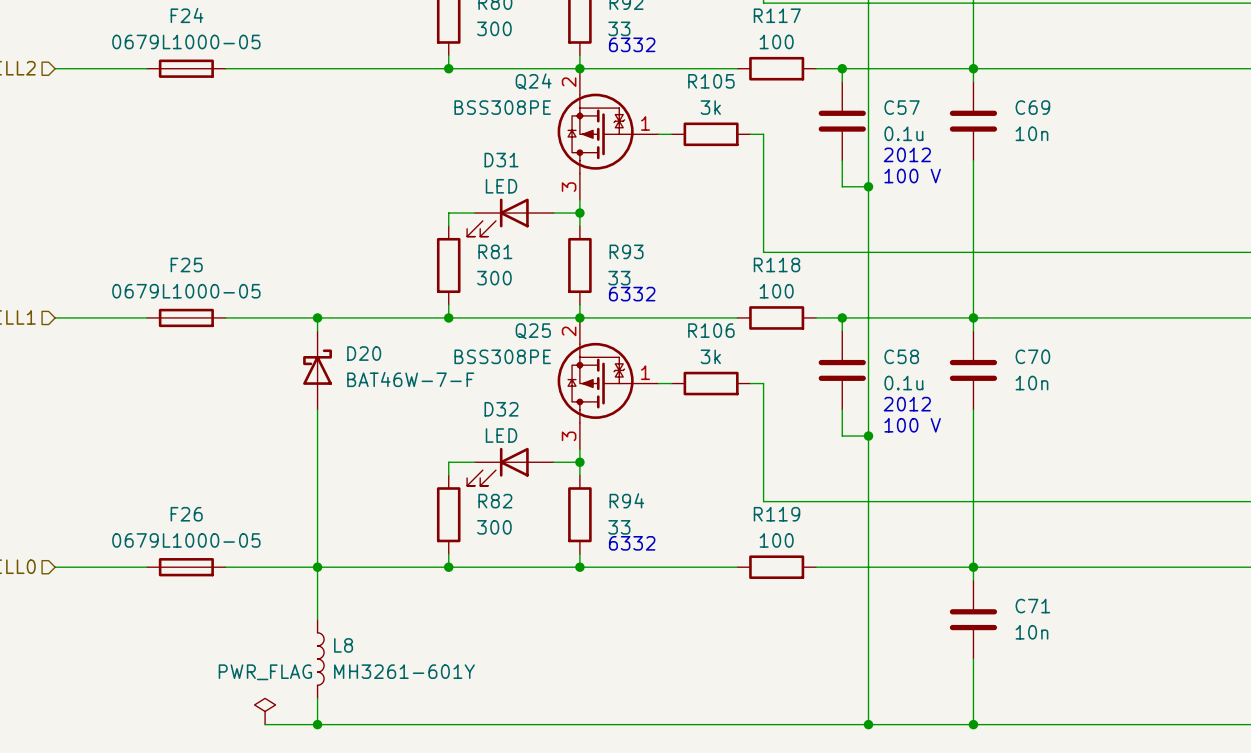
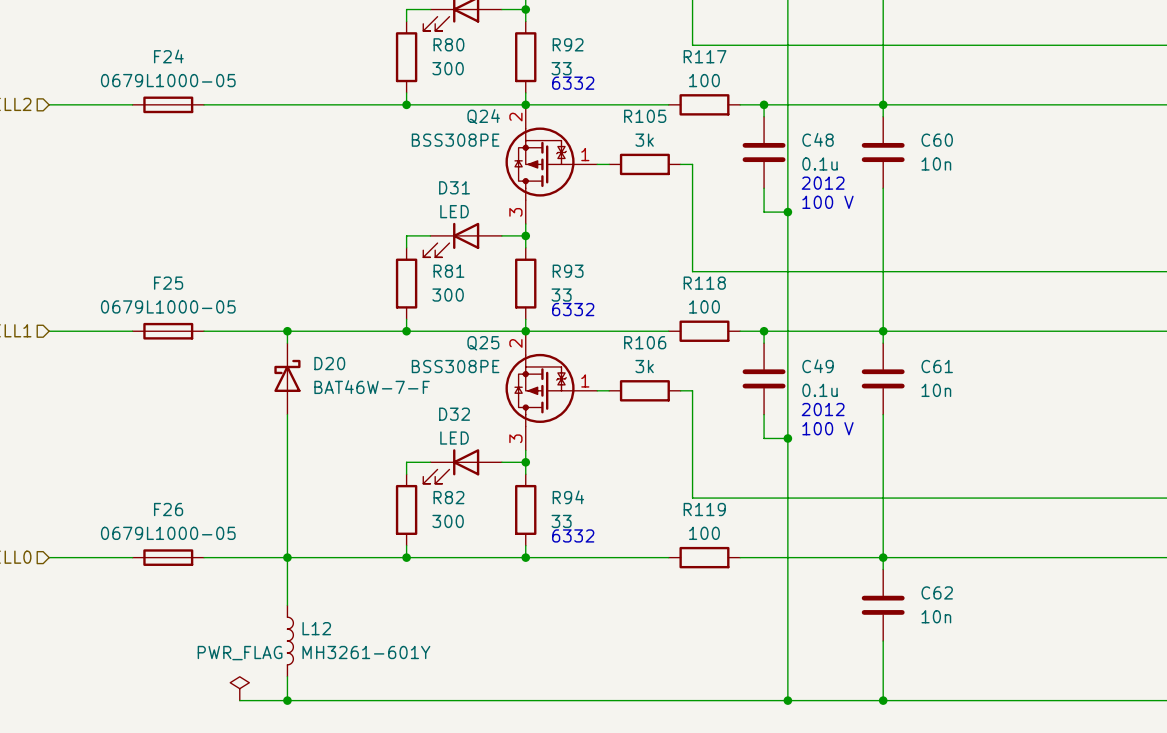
C57 name: C57 (902, 107) -> C48 (818, 139)
C69 name: C69 (1032, 107) -> C60 (937, 140)
C58 name: C58 (901, 356) -> C49 (818, 366)
C70 name: C70 (1032, 356) -> C61 (937, 366)
C71 name: C71 (1032, 606) -> C62 (937, 592)
L8 name: L8 (343, 645) -> L12 (316, 628)

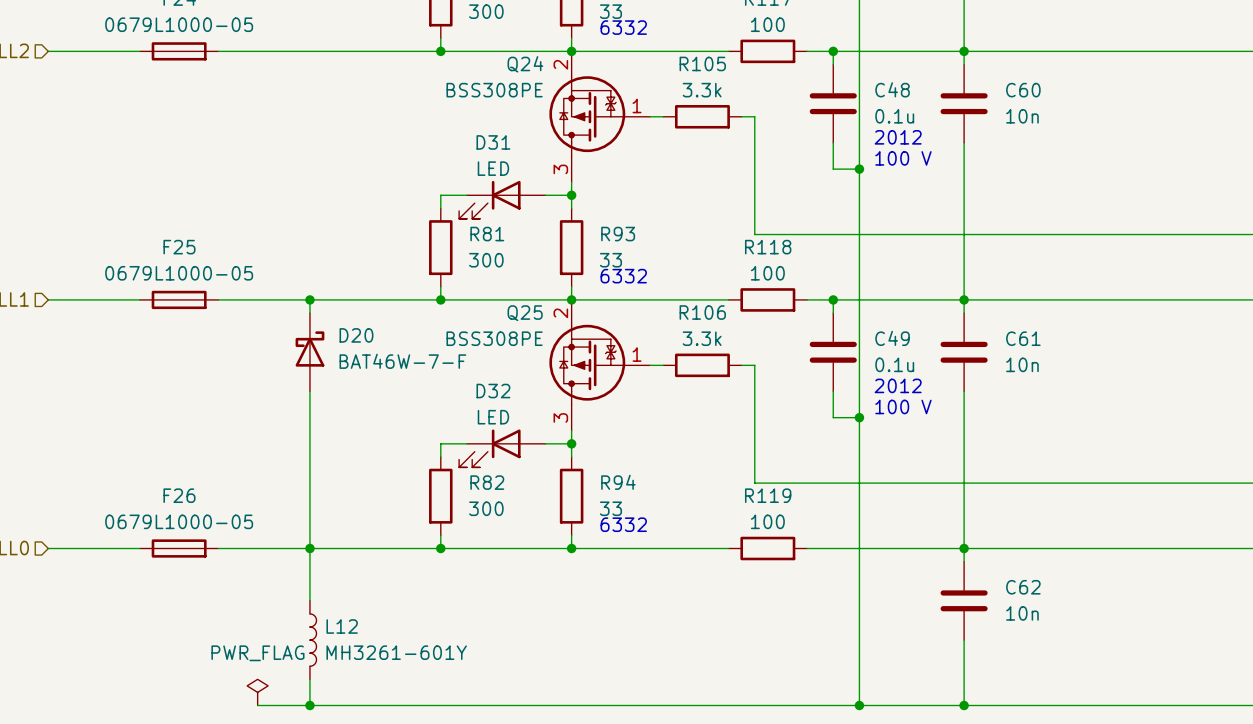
R105 value: 3k (644, 140) -> 3.3k (702, 90)
R106 value: 3k (644, 366) -> 3.3k (702, 338)

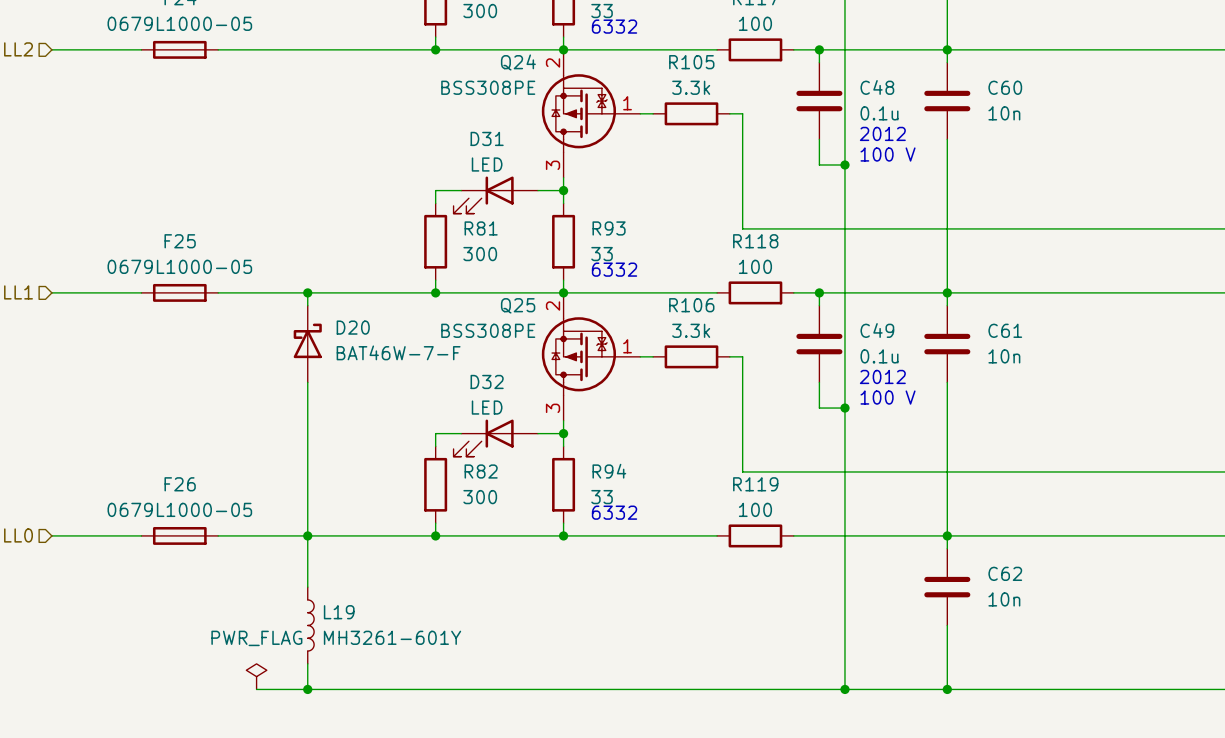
L12 name: L12 (342, 626) -> L19 (339, 612)

